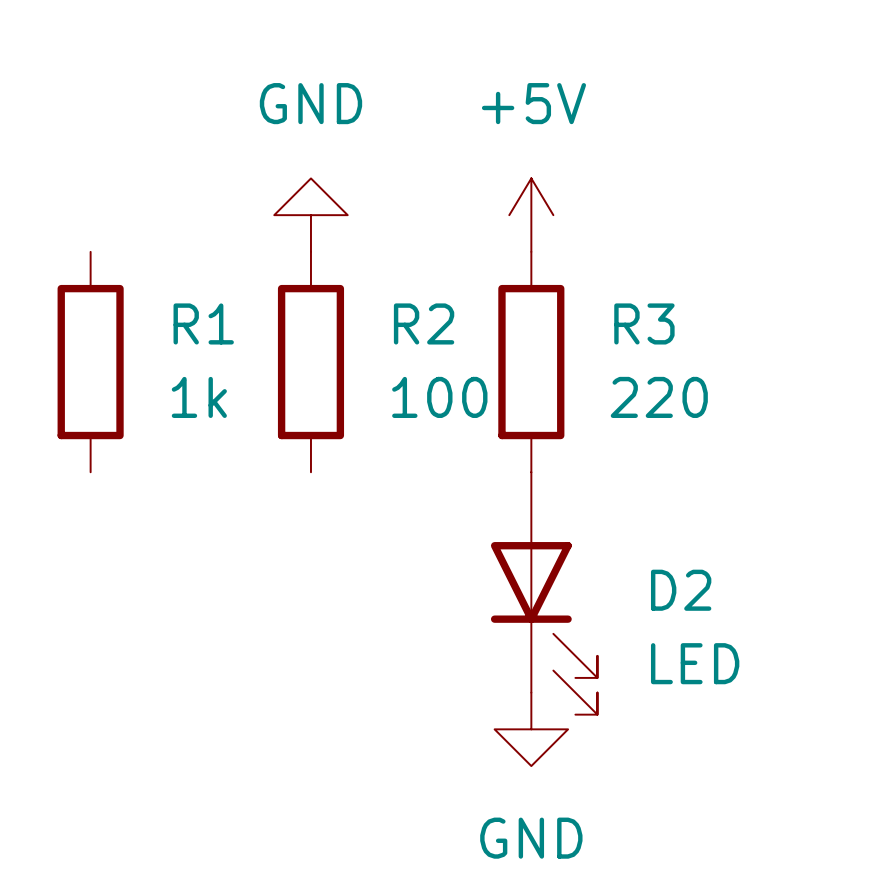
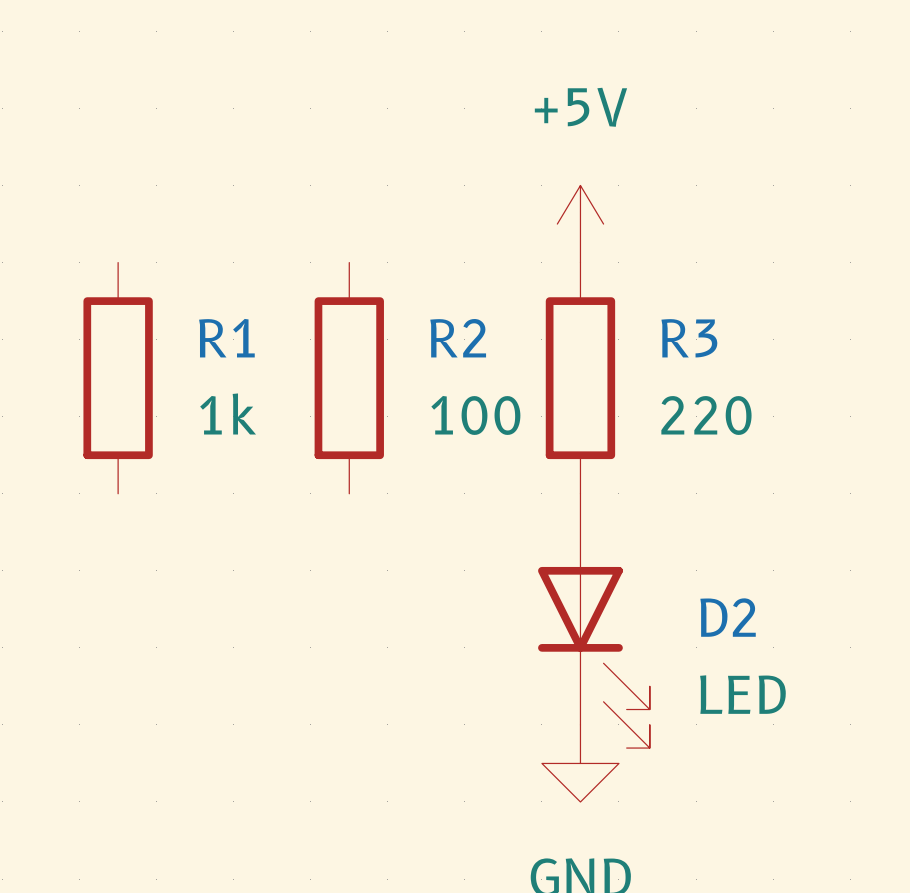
power symbol: GND (310, 215) -> none

